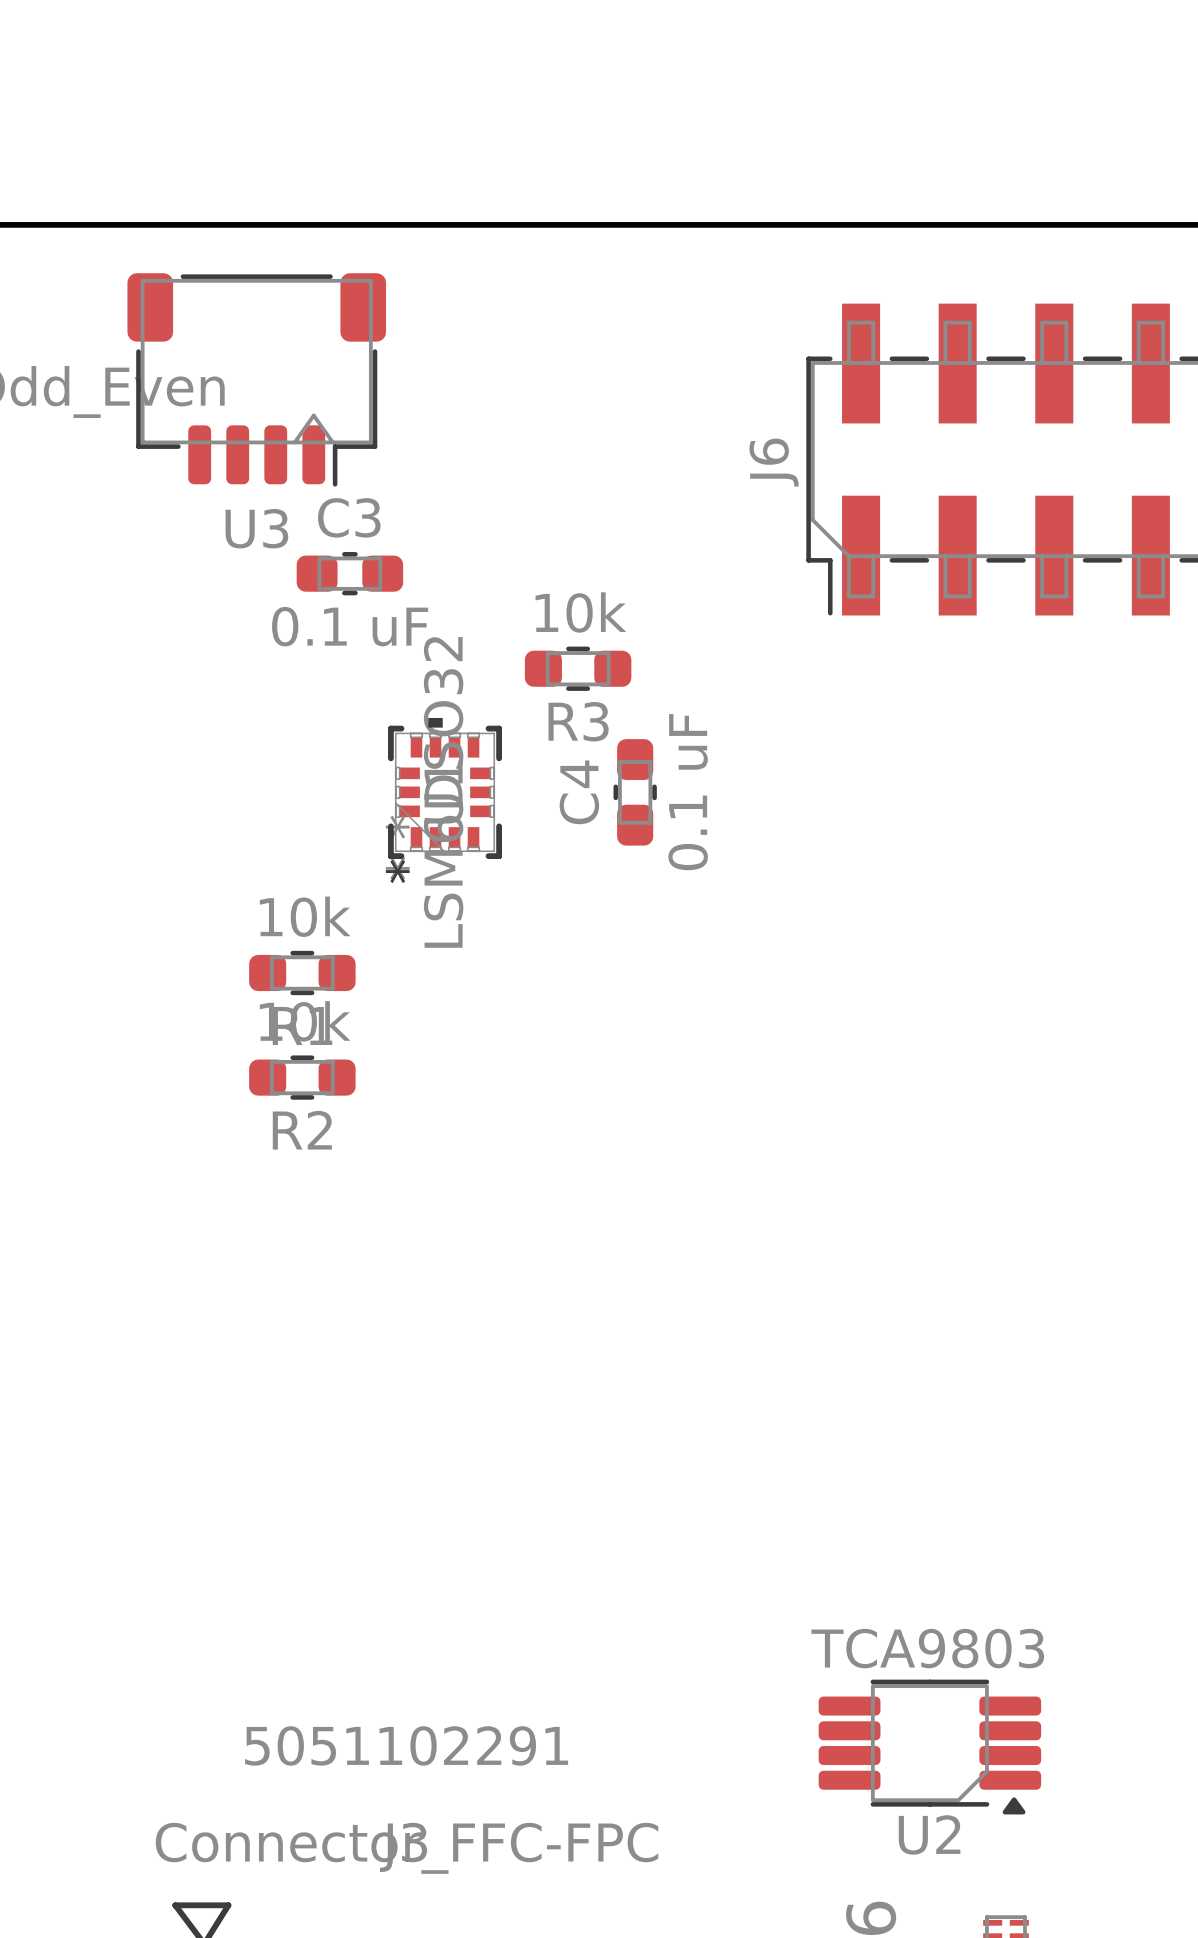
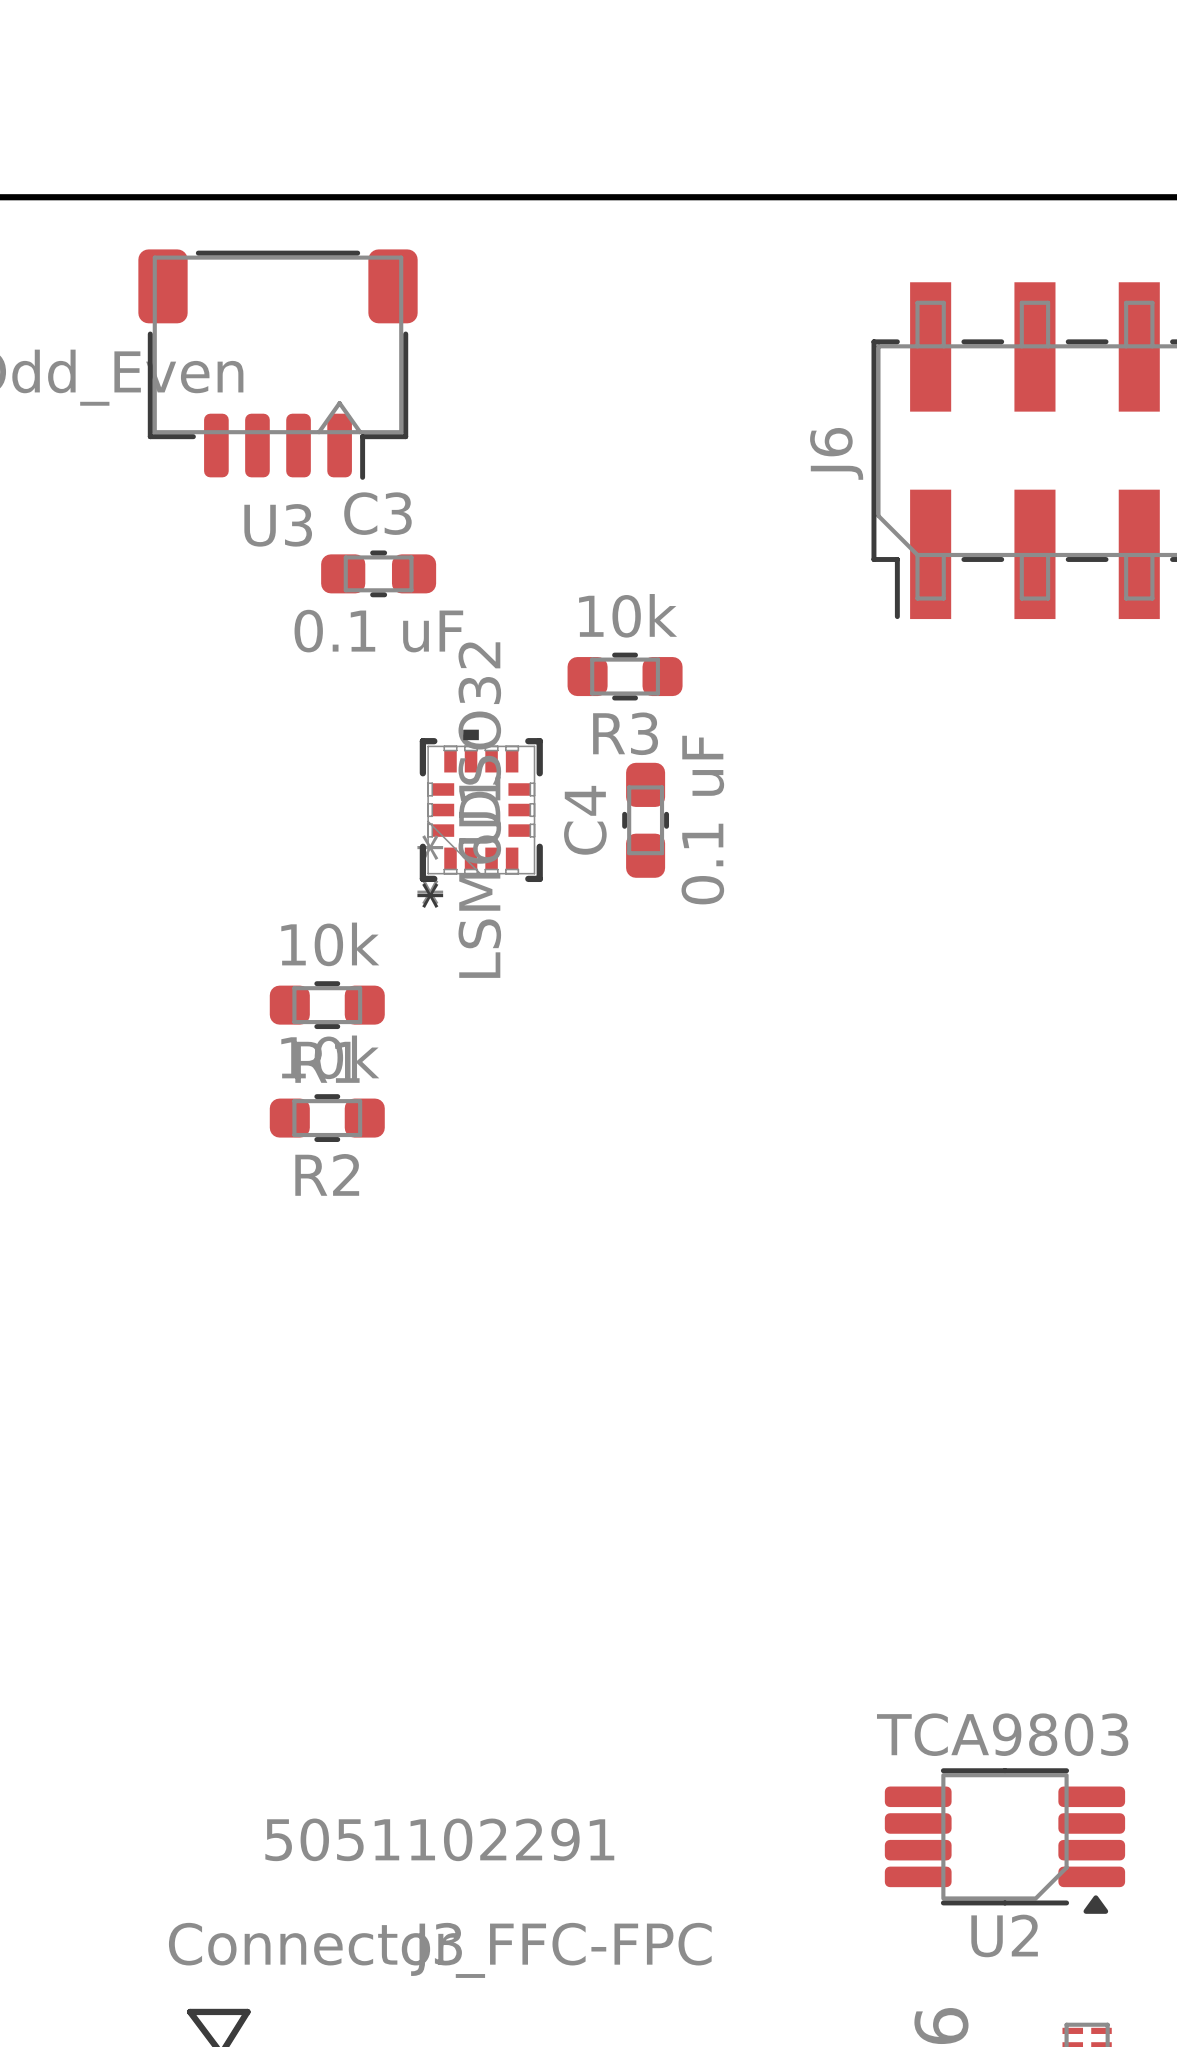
C4 position: (635, 792) -> (645, 820)

